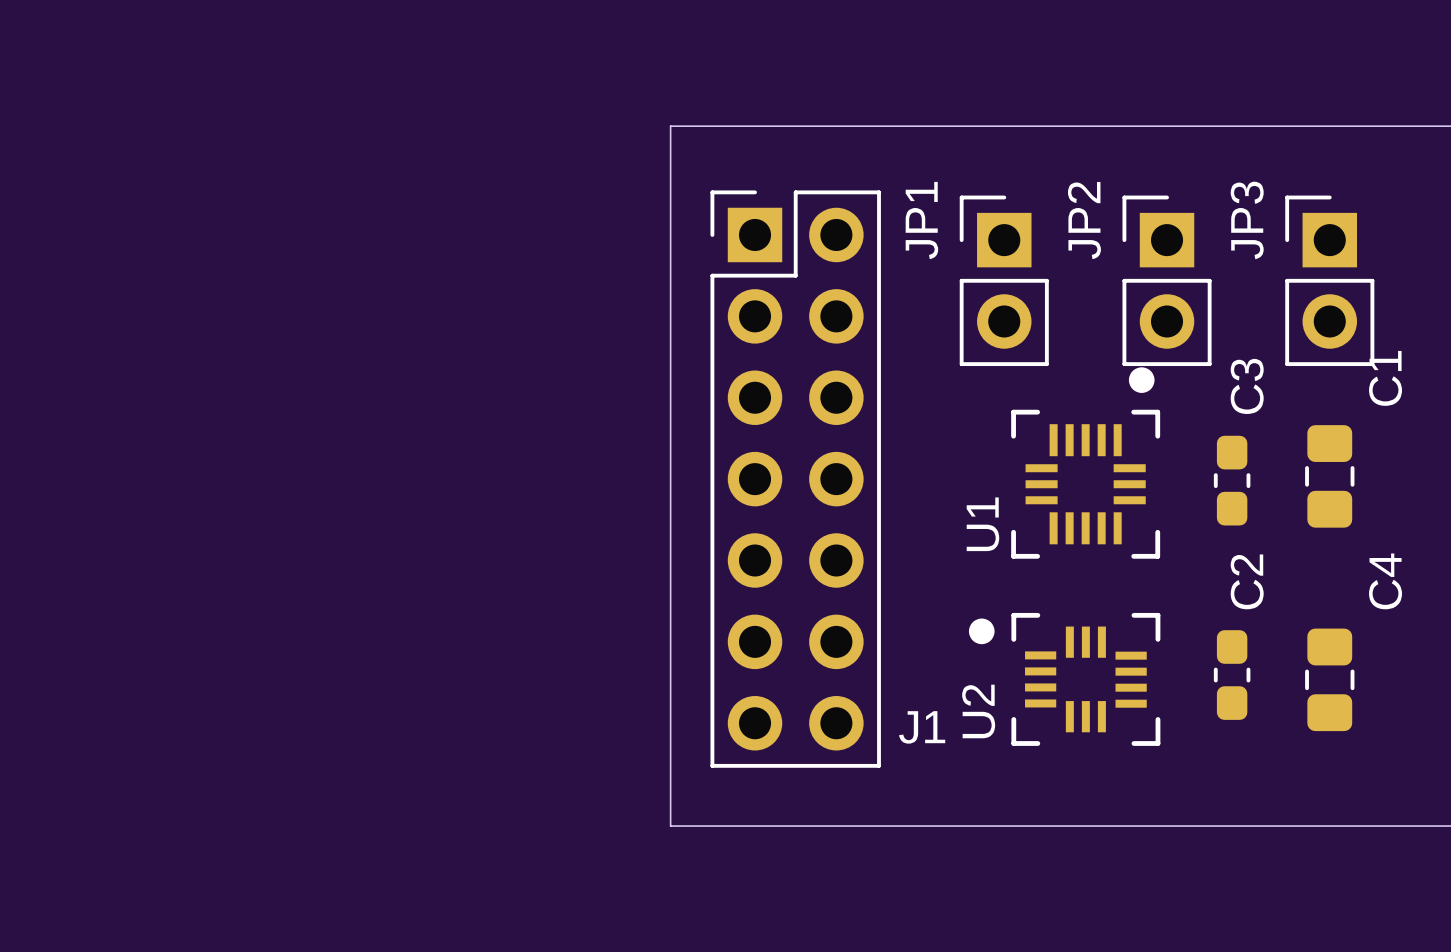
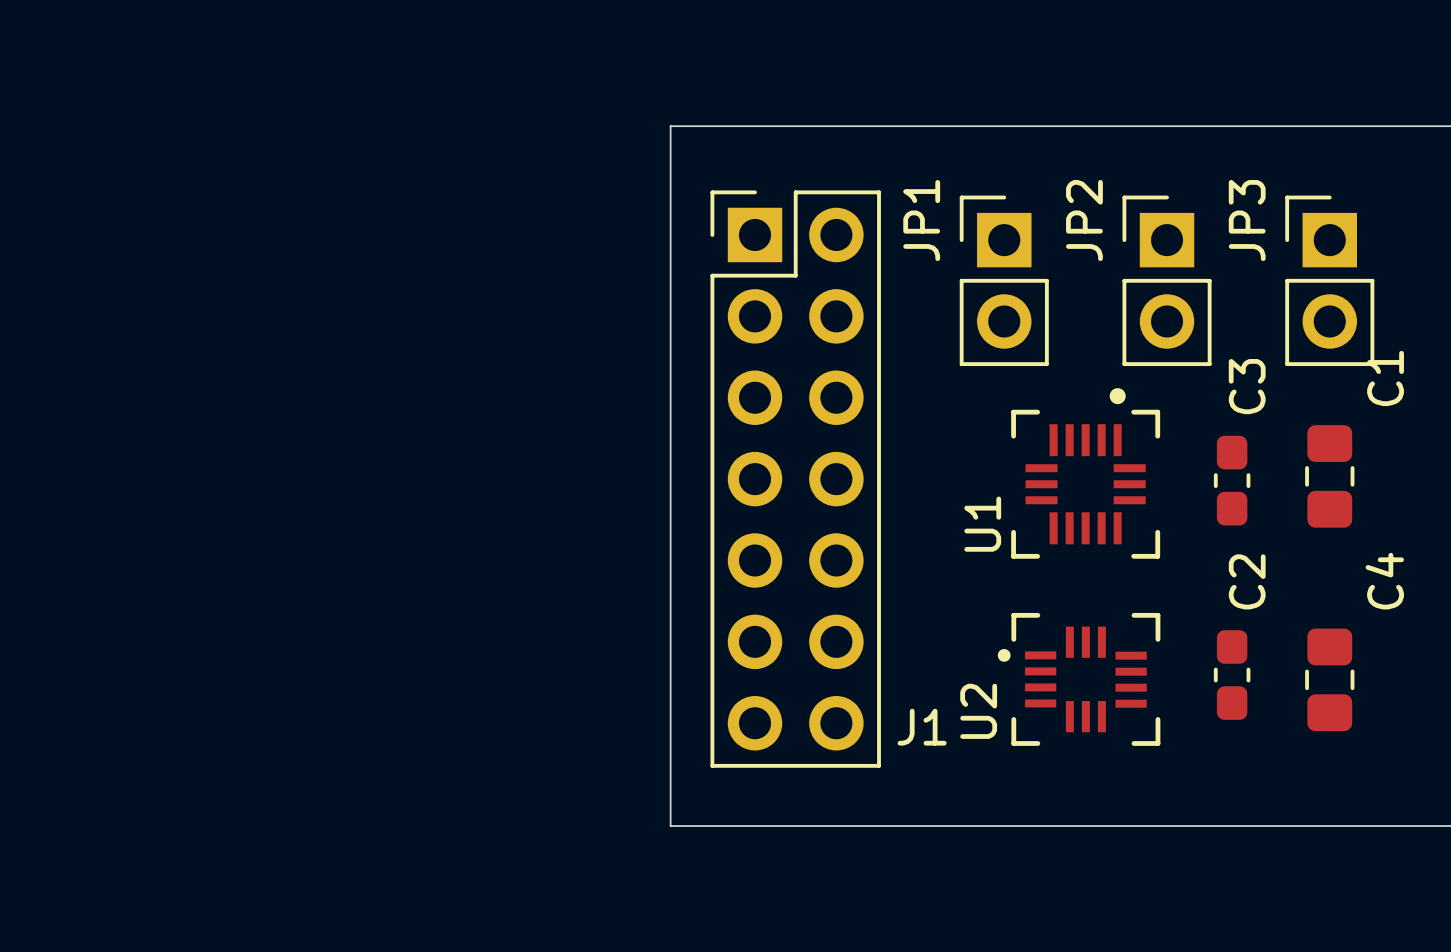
U1 footprint: [1011, 367, 1161, 559] -> [1011, 388, 1161, 559]
U2 footprint: [968, 612, 1161, 746] -> [997, 612, 1161, 746]

